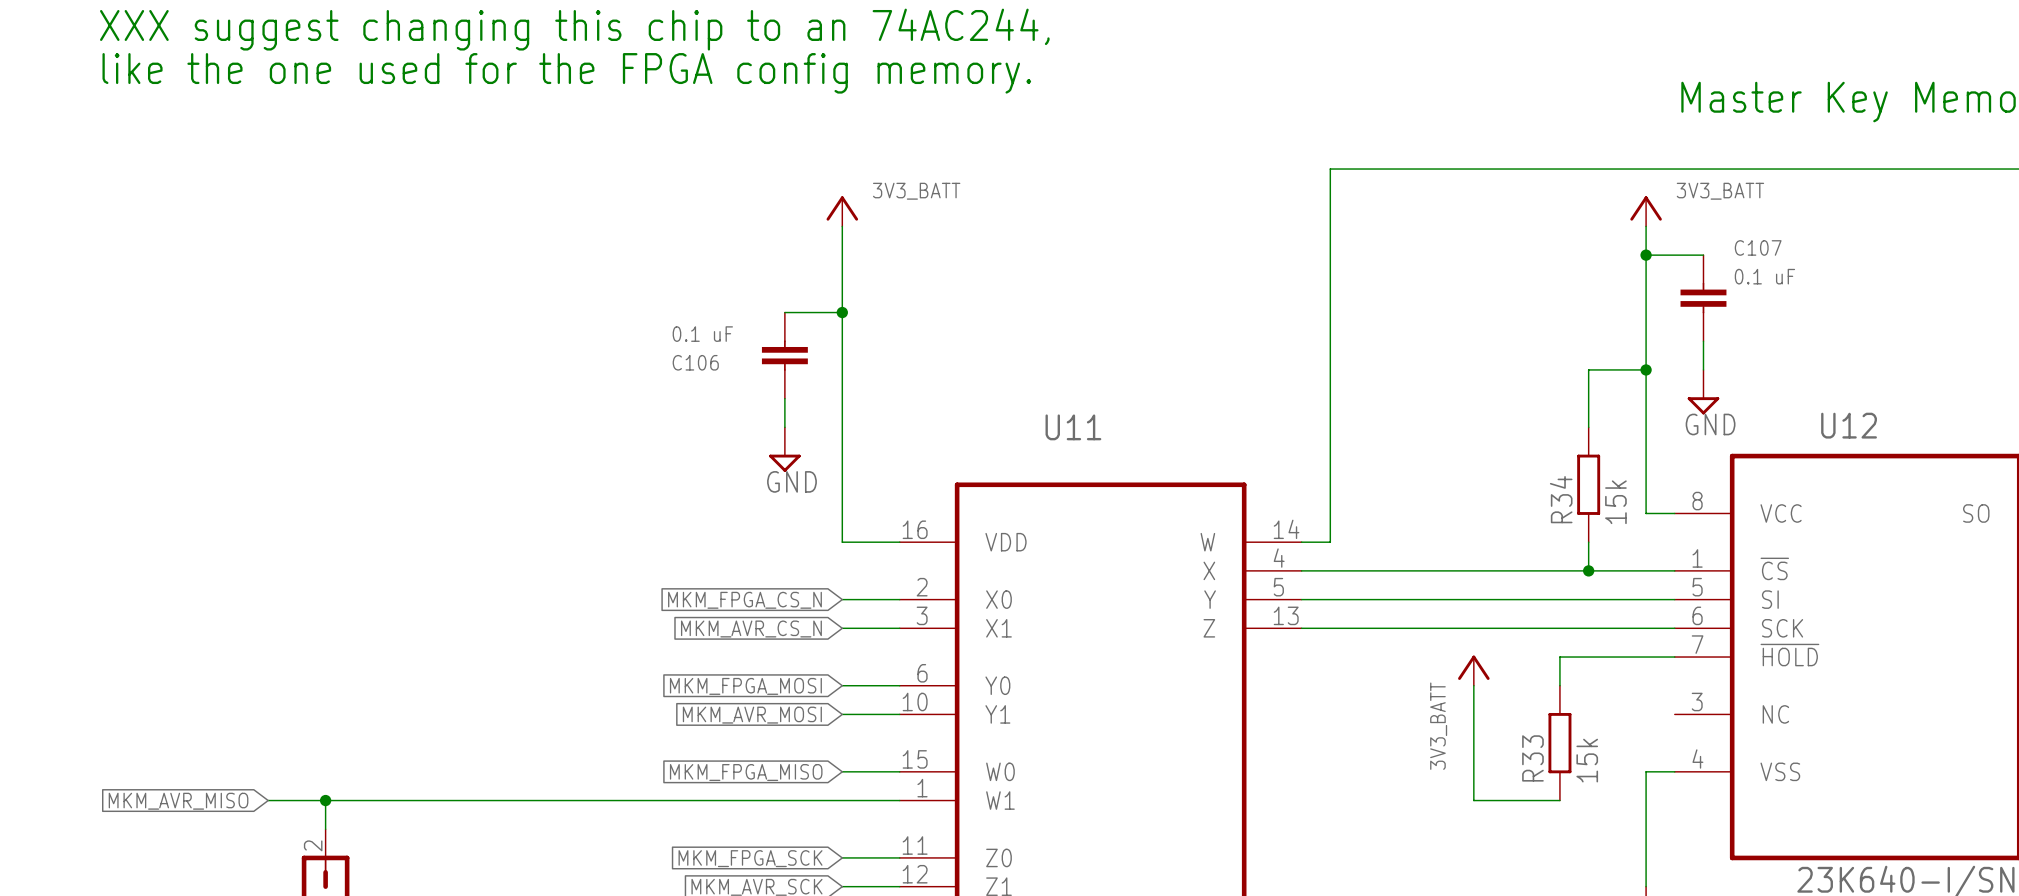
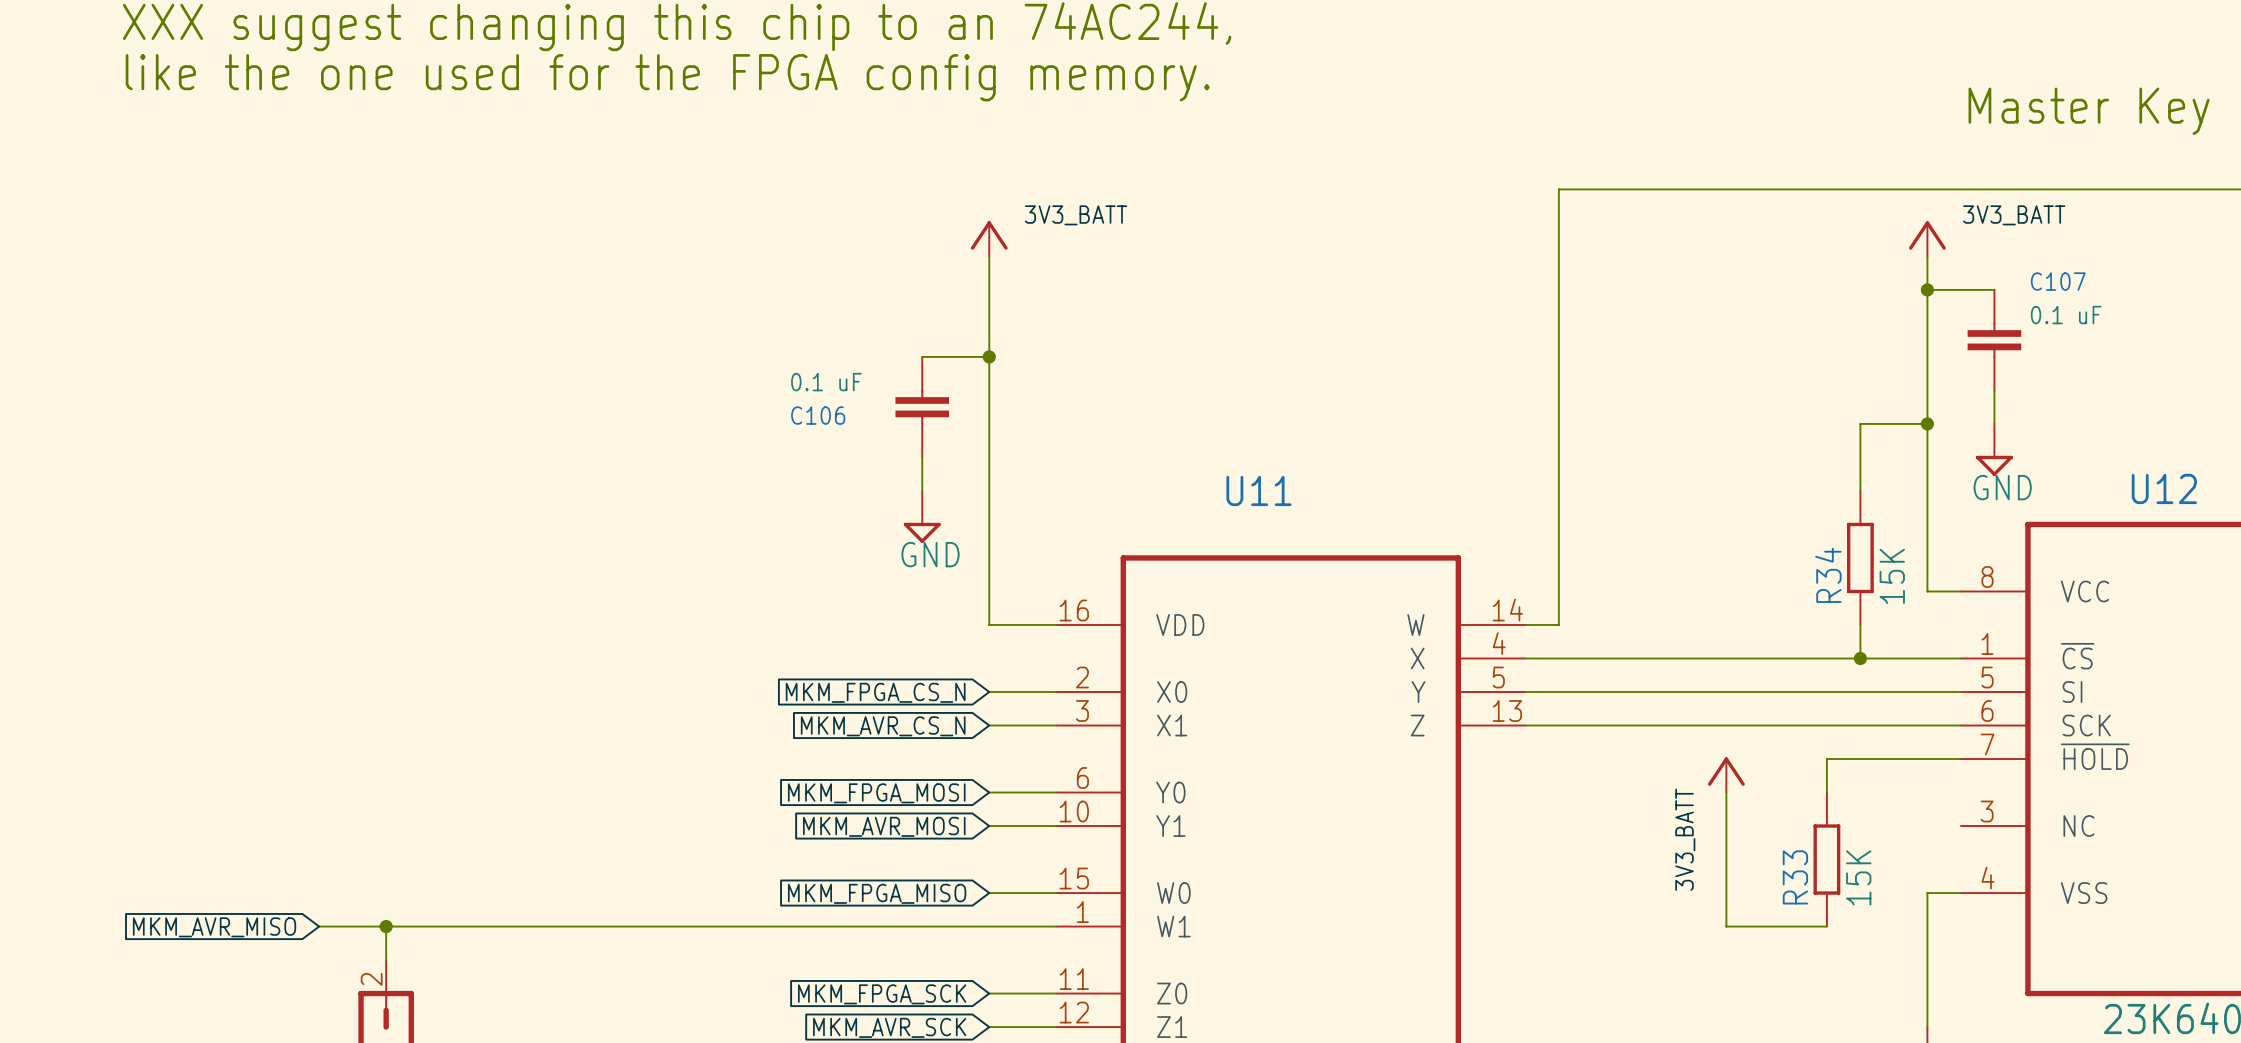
R34 value: 15k (1615, 502) -> 15K (1892, 576)
R33 value: 15k (1587, 760) -> 15K (1858, 877)

